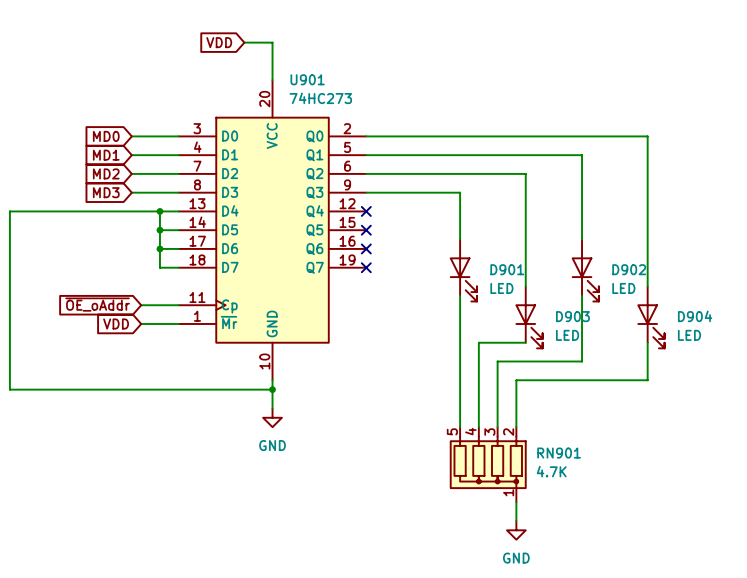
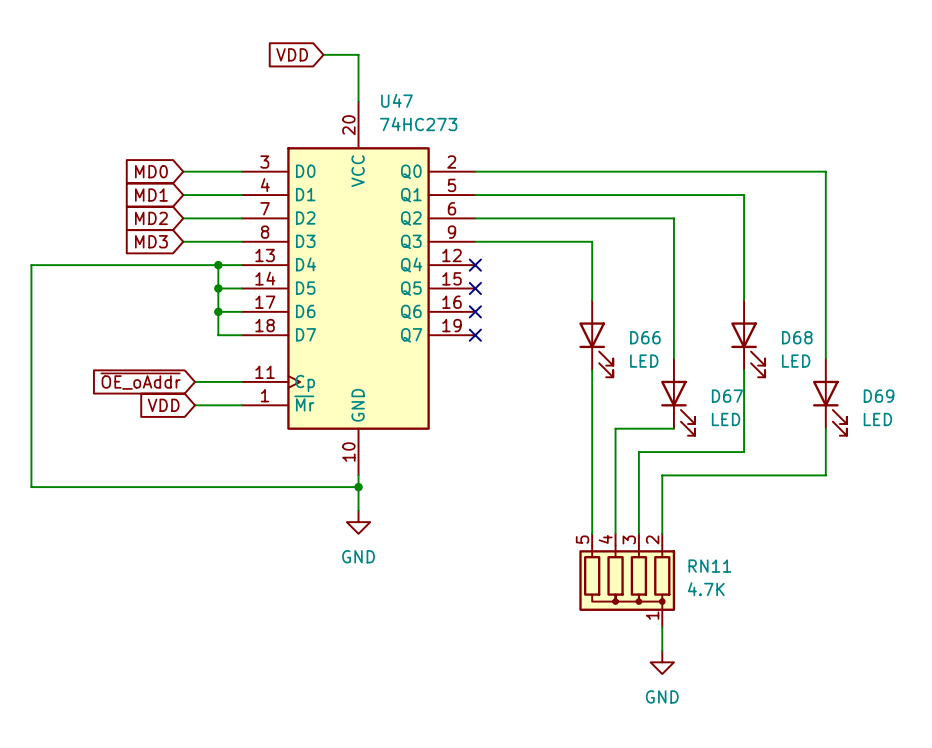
U901 name: U901 (307, 79) -> U47 (396, 100)
D901 name: D901 (507, 269) -> D66 (645, 337)
D902 name: D902 (629, 269) -> D68 (797, 337)
D903 name: D903 (572, 316) -> D67 (727, 396)
D904 name: D904 (695, 316) -> D69 (879, 396)
RN901 name: RN901 (559, 453) -> RN11 (709, 566)

